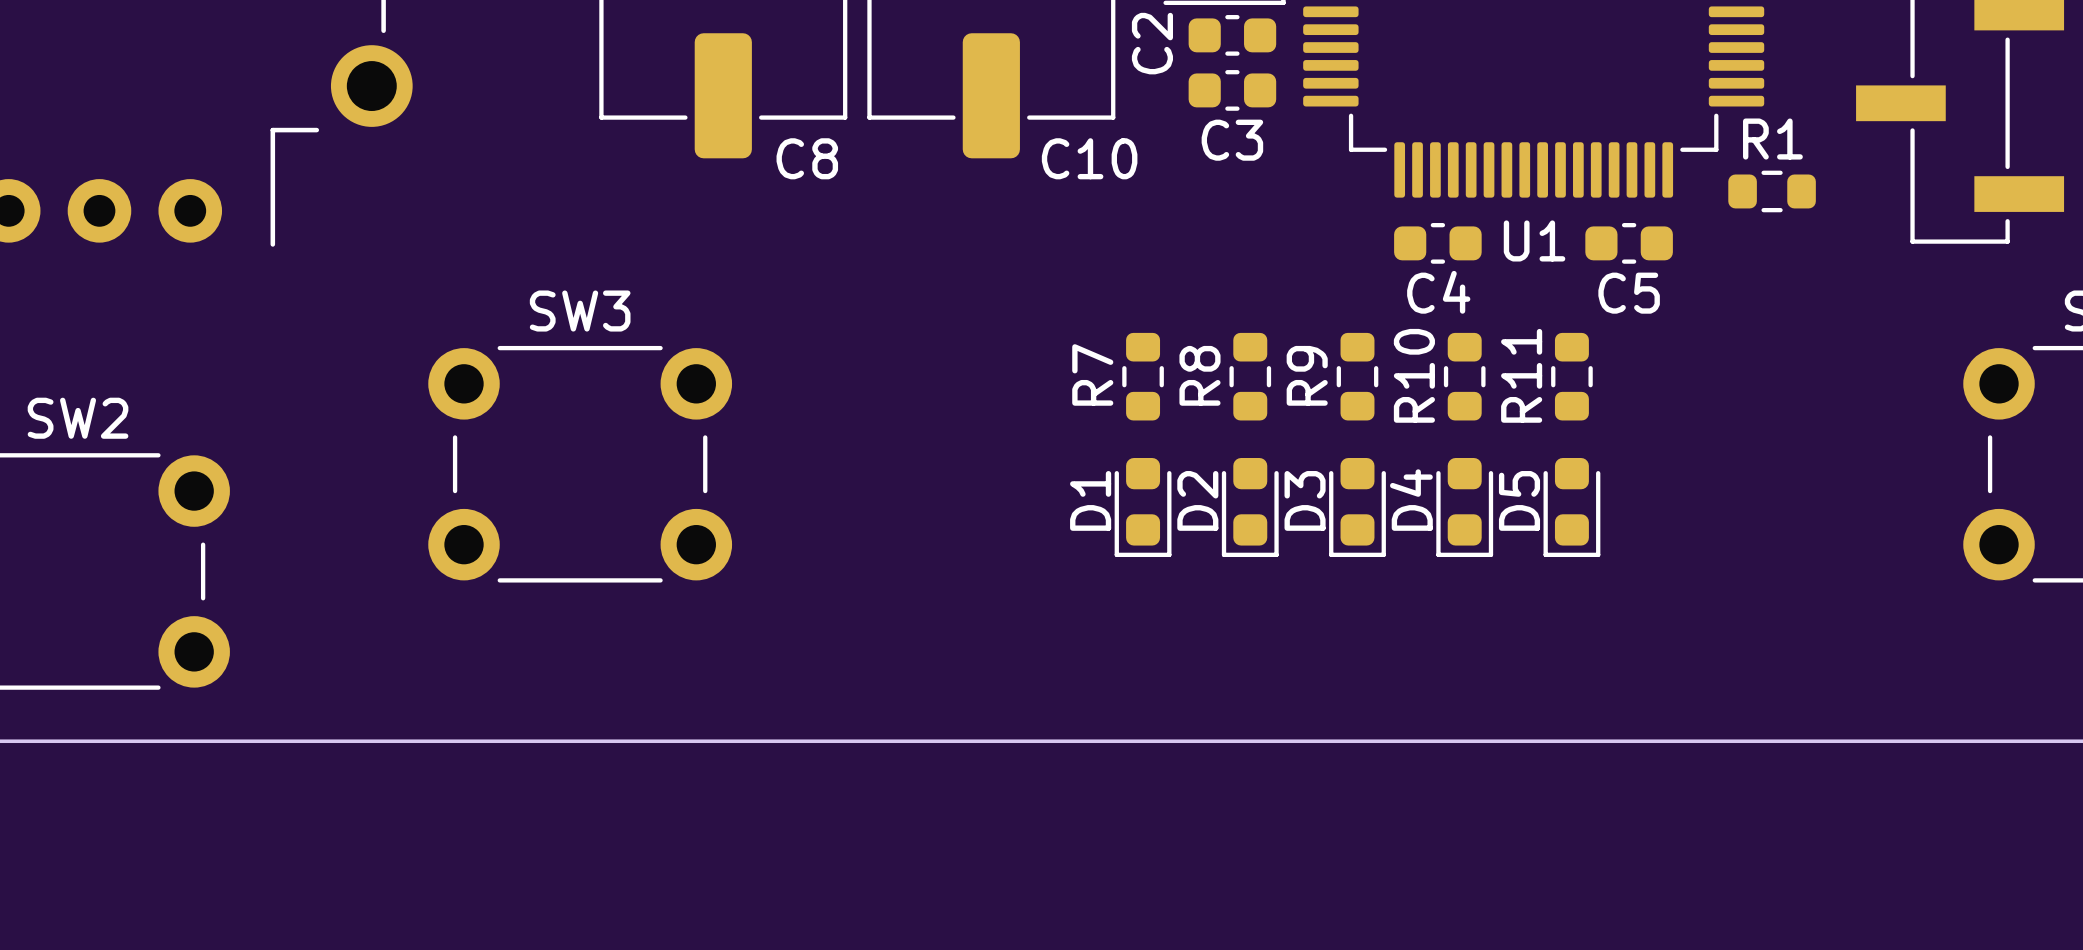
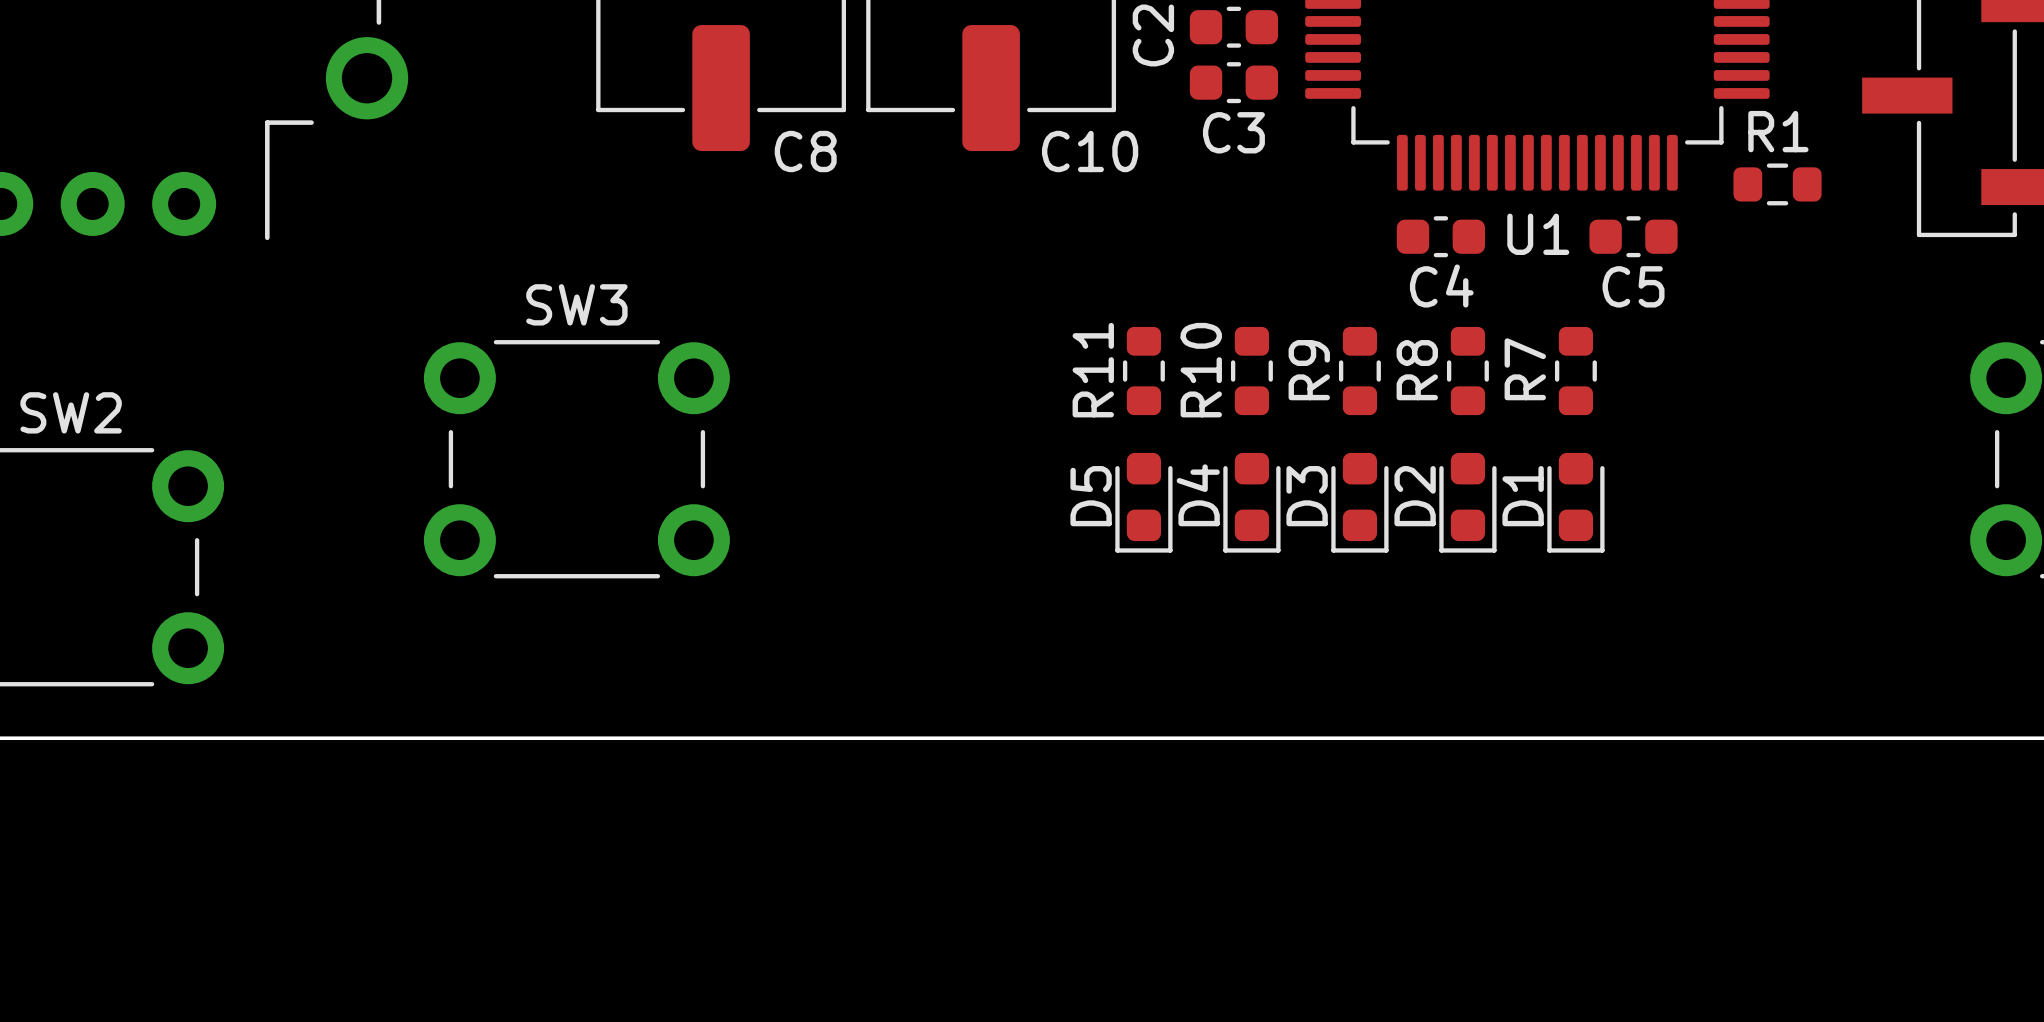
R7 name: R7 (1092, 374) -> R11 (1093, 370)
R8 name: R8 (1199, 375) -> R10 (1201, 370)
R10 name: R10 (1414, 375) -> R8 (1417, 370)
R11 name: R11 (1521, 375) -> R7 (1525, 369)
D1 name: D1 (1090, 500) -> D5 (1091, 496)
D2 name: D2 (1197, 500) -> D4 (1198, 495)
D4 name: D4 (1411, 500) -> D2 (1415, 496)
D5 name: D5 (1519, 500) -> D1 (1523, 496)

